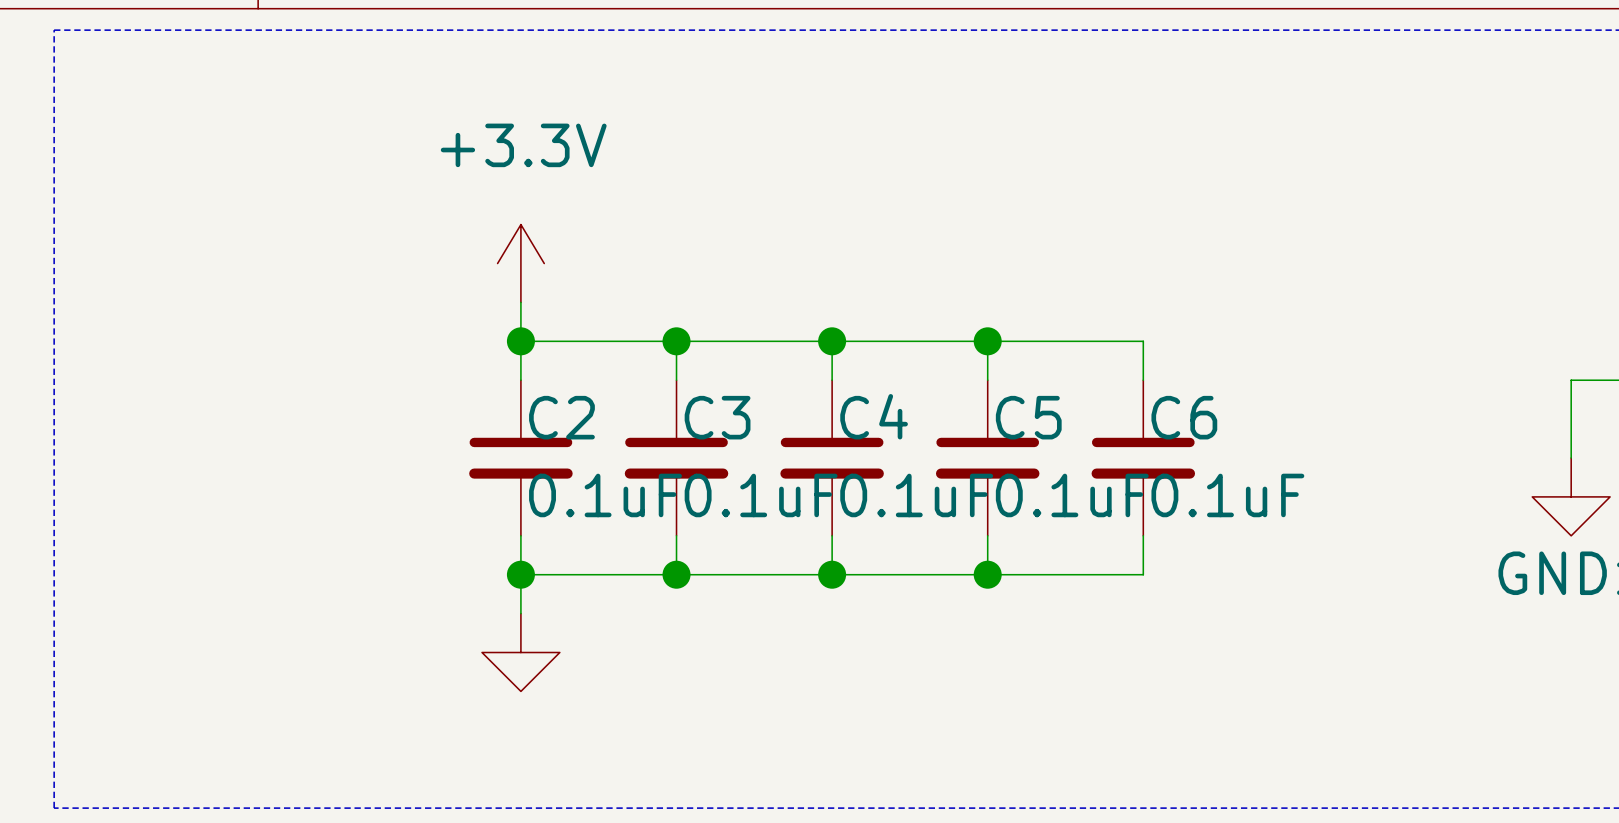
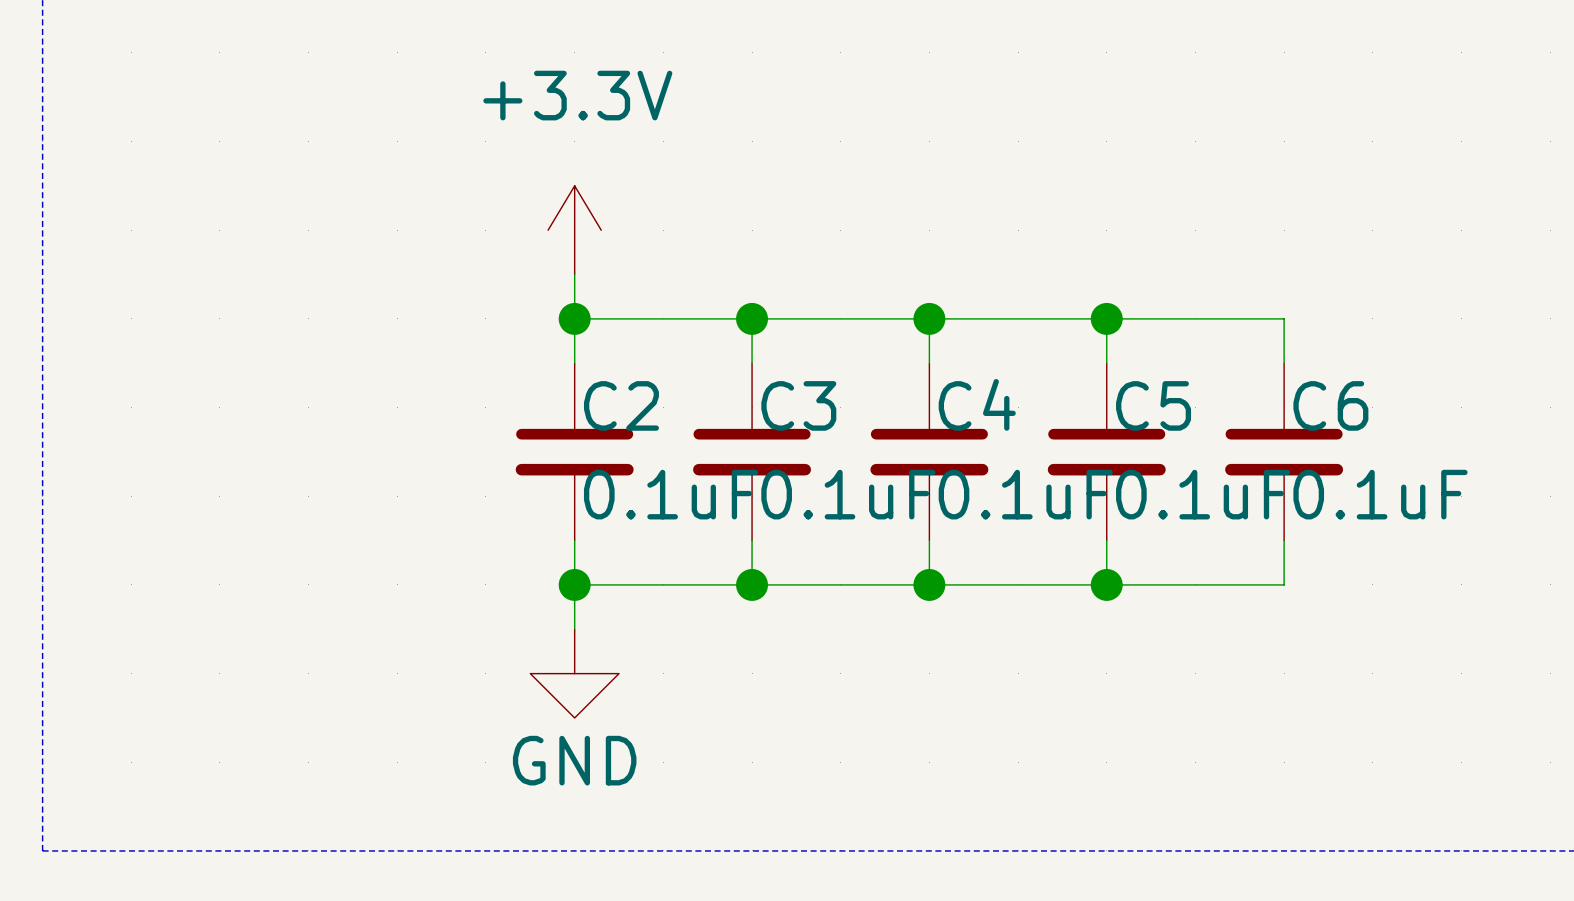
power symbol text: none -> GND (574, 760)

